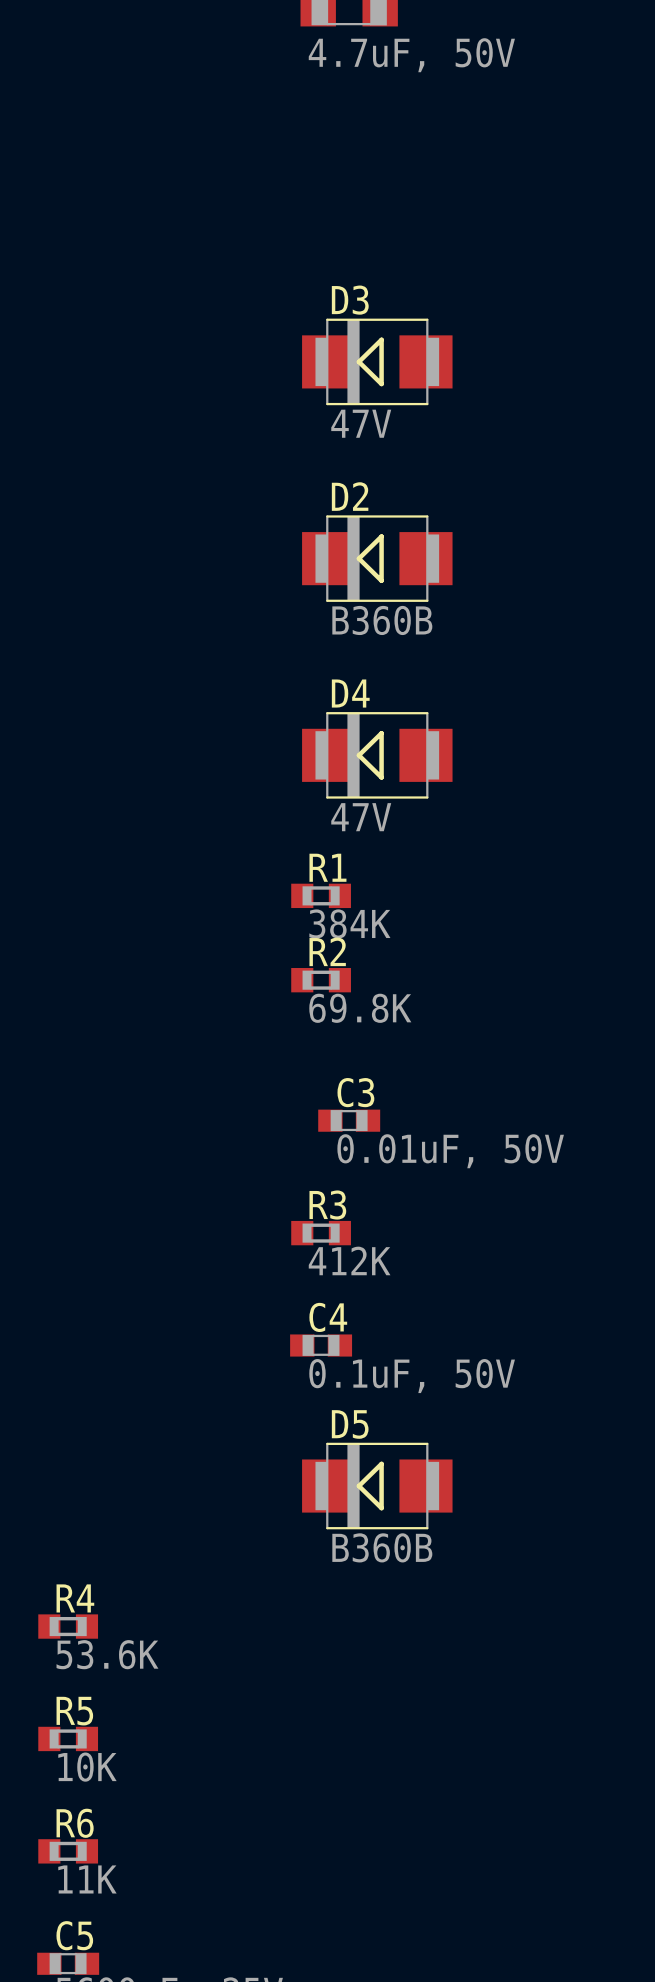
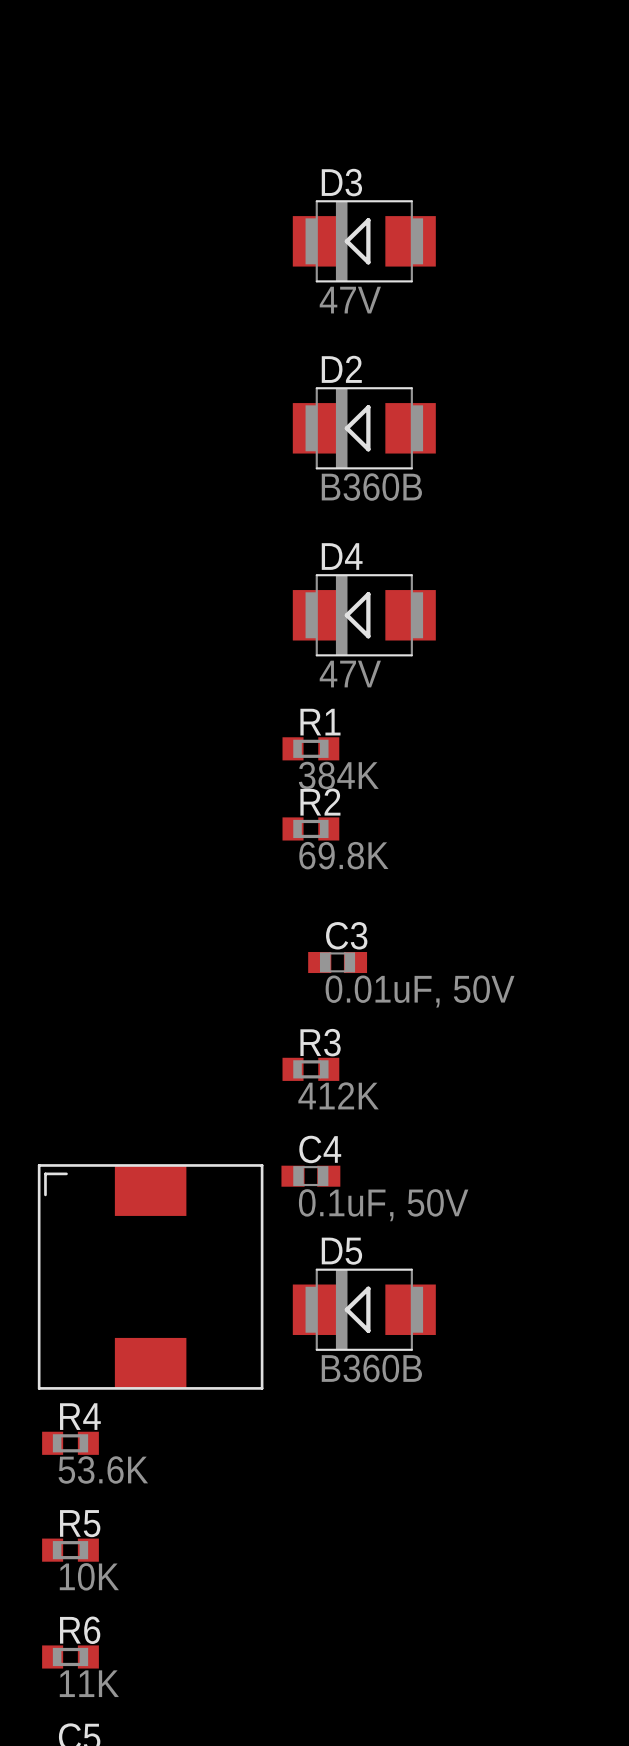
part: none -> (150, 1276)

